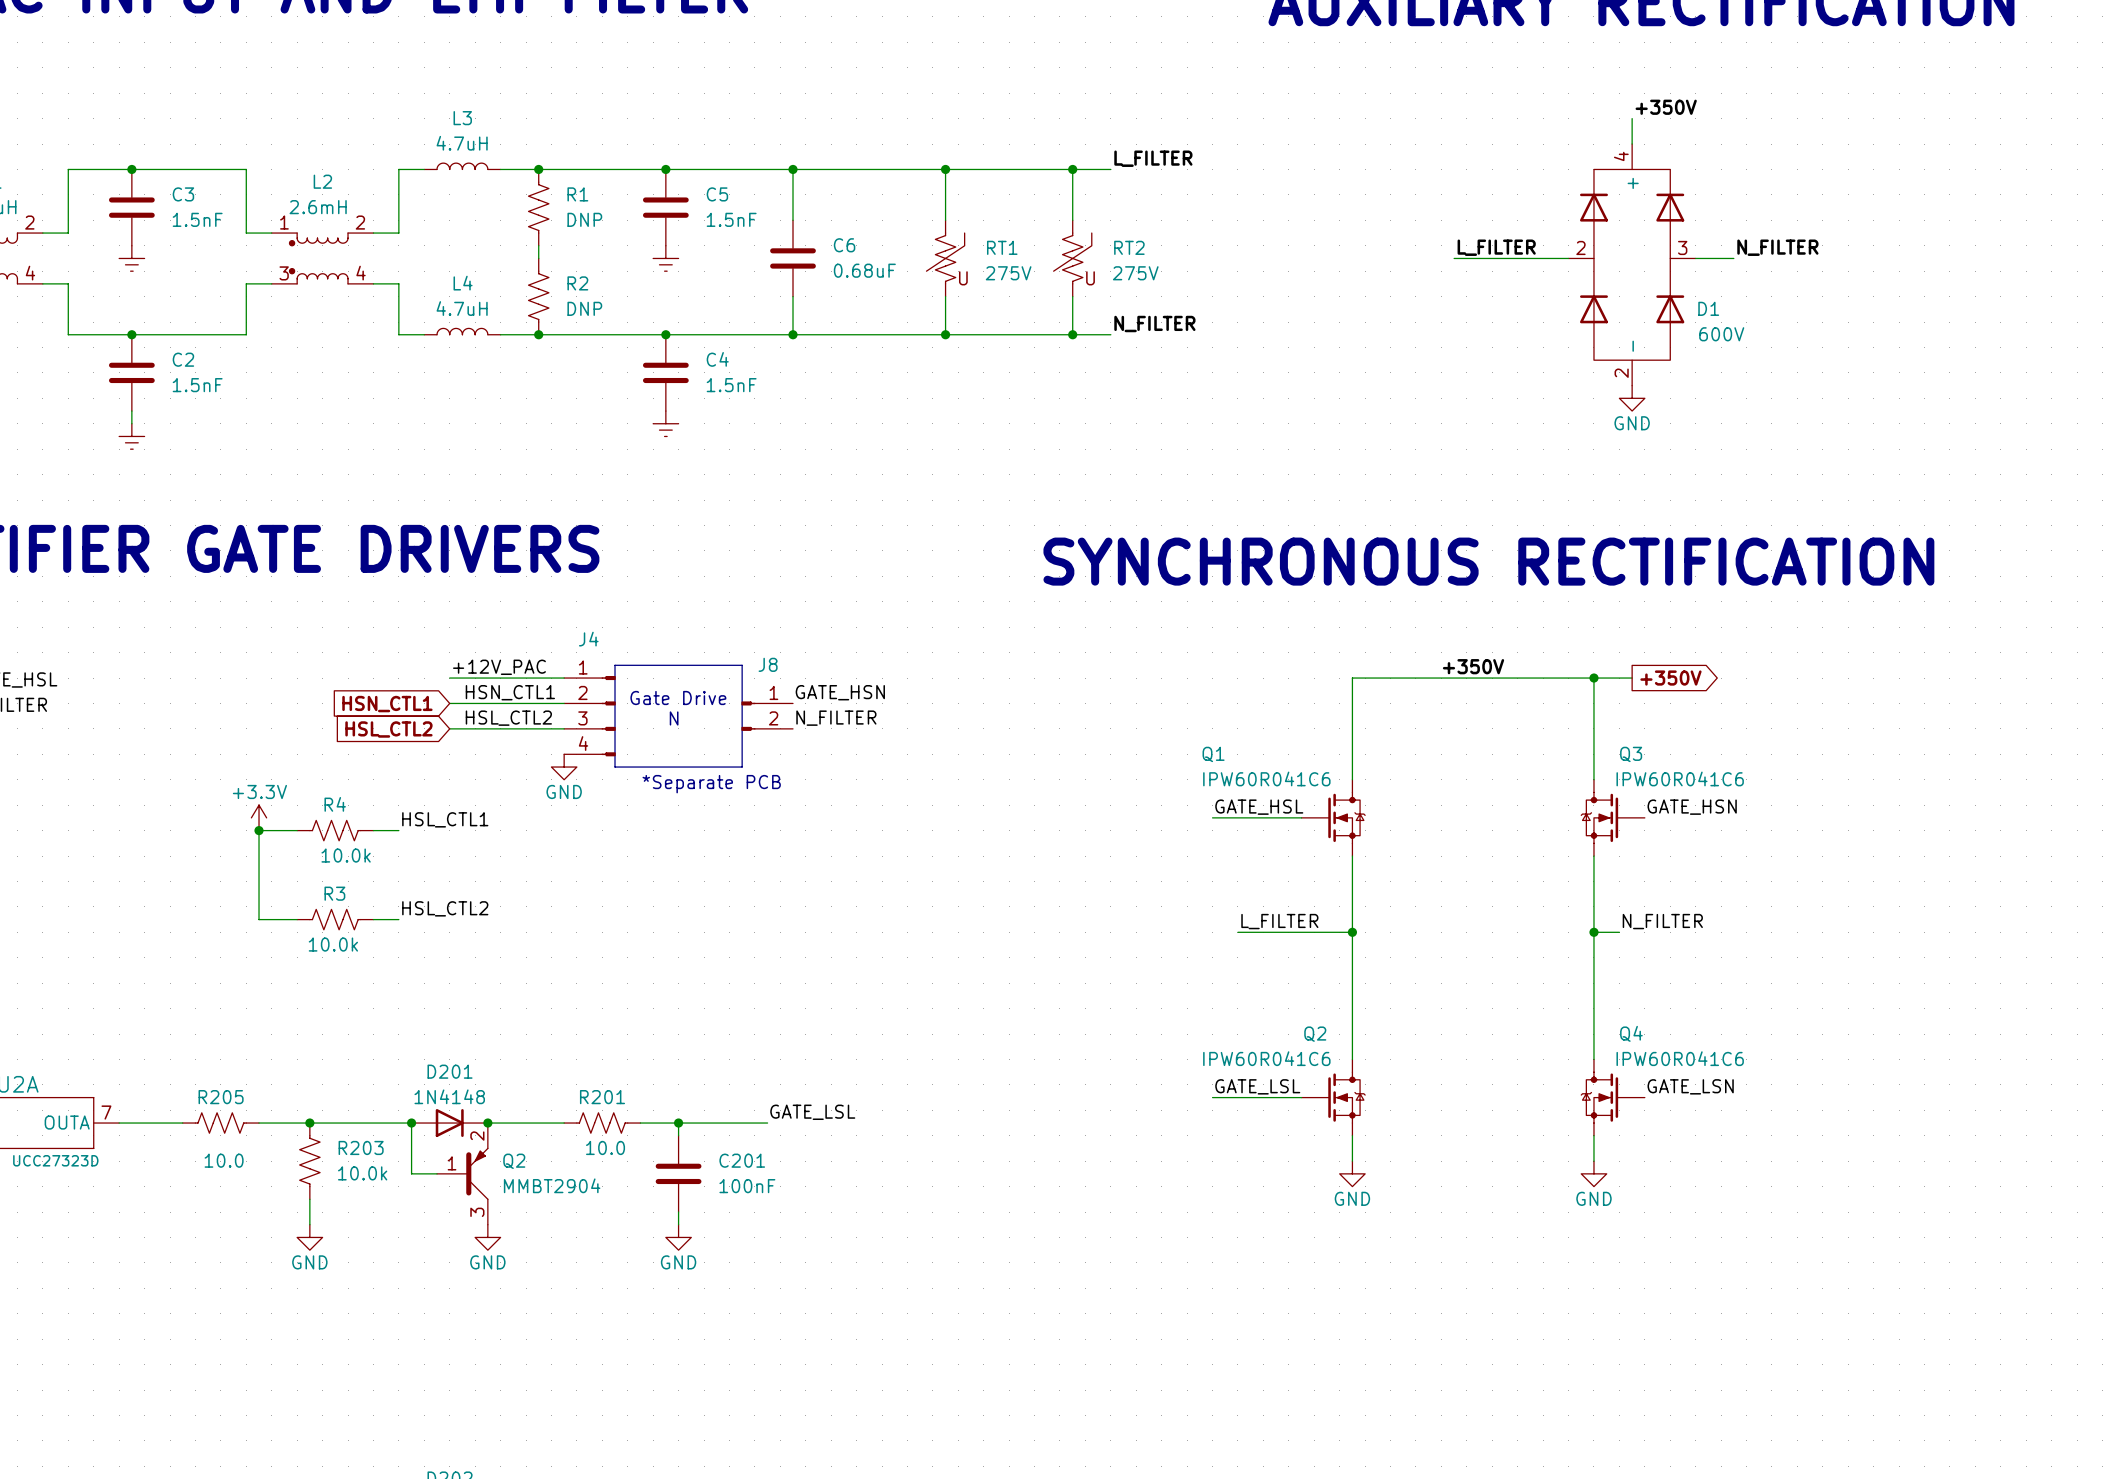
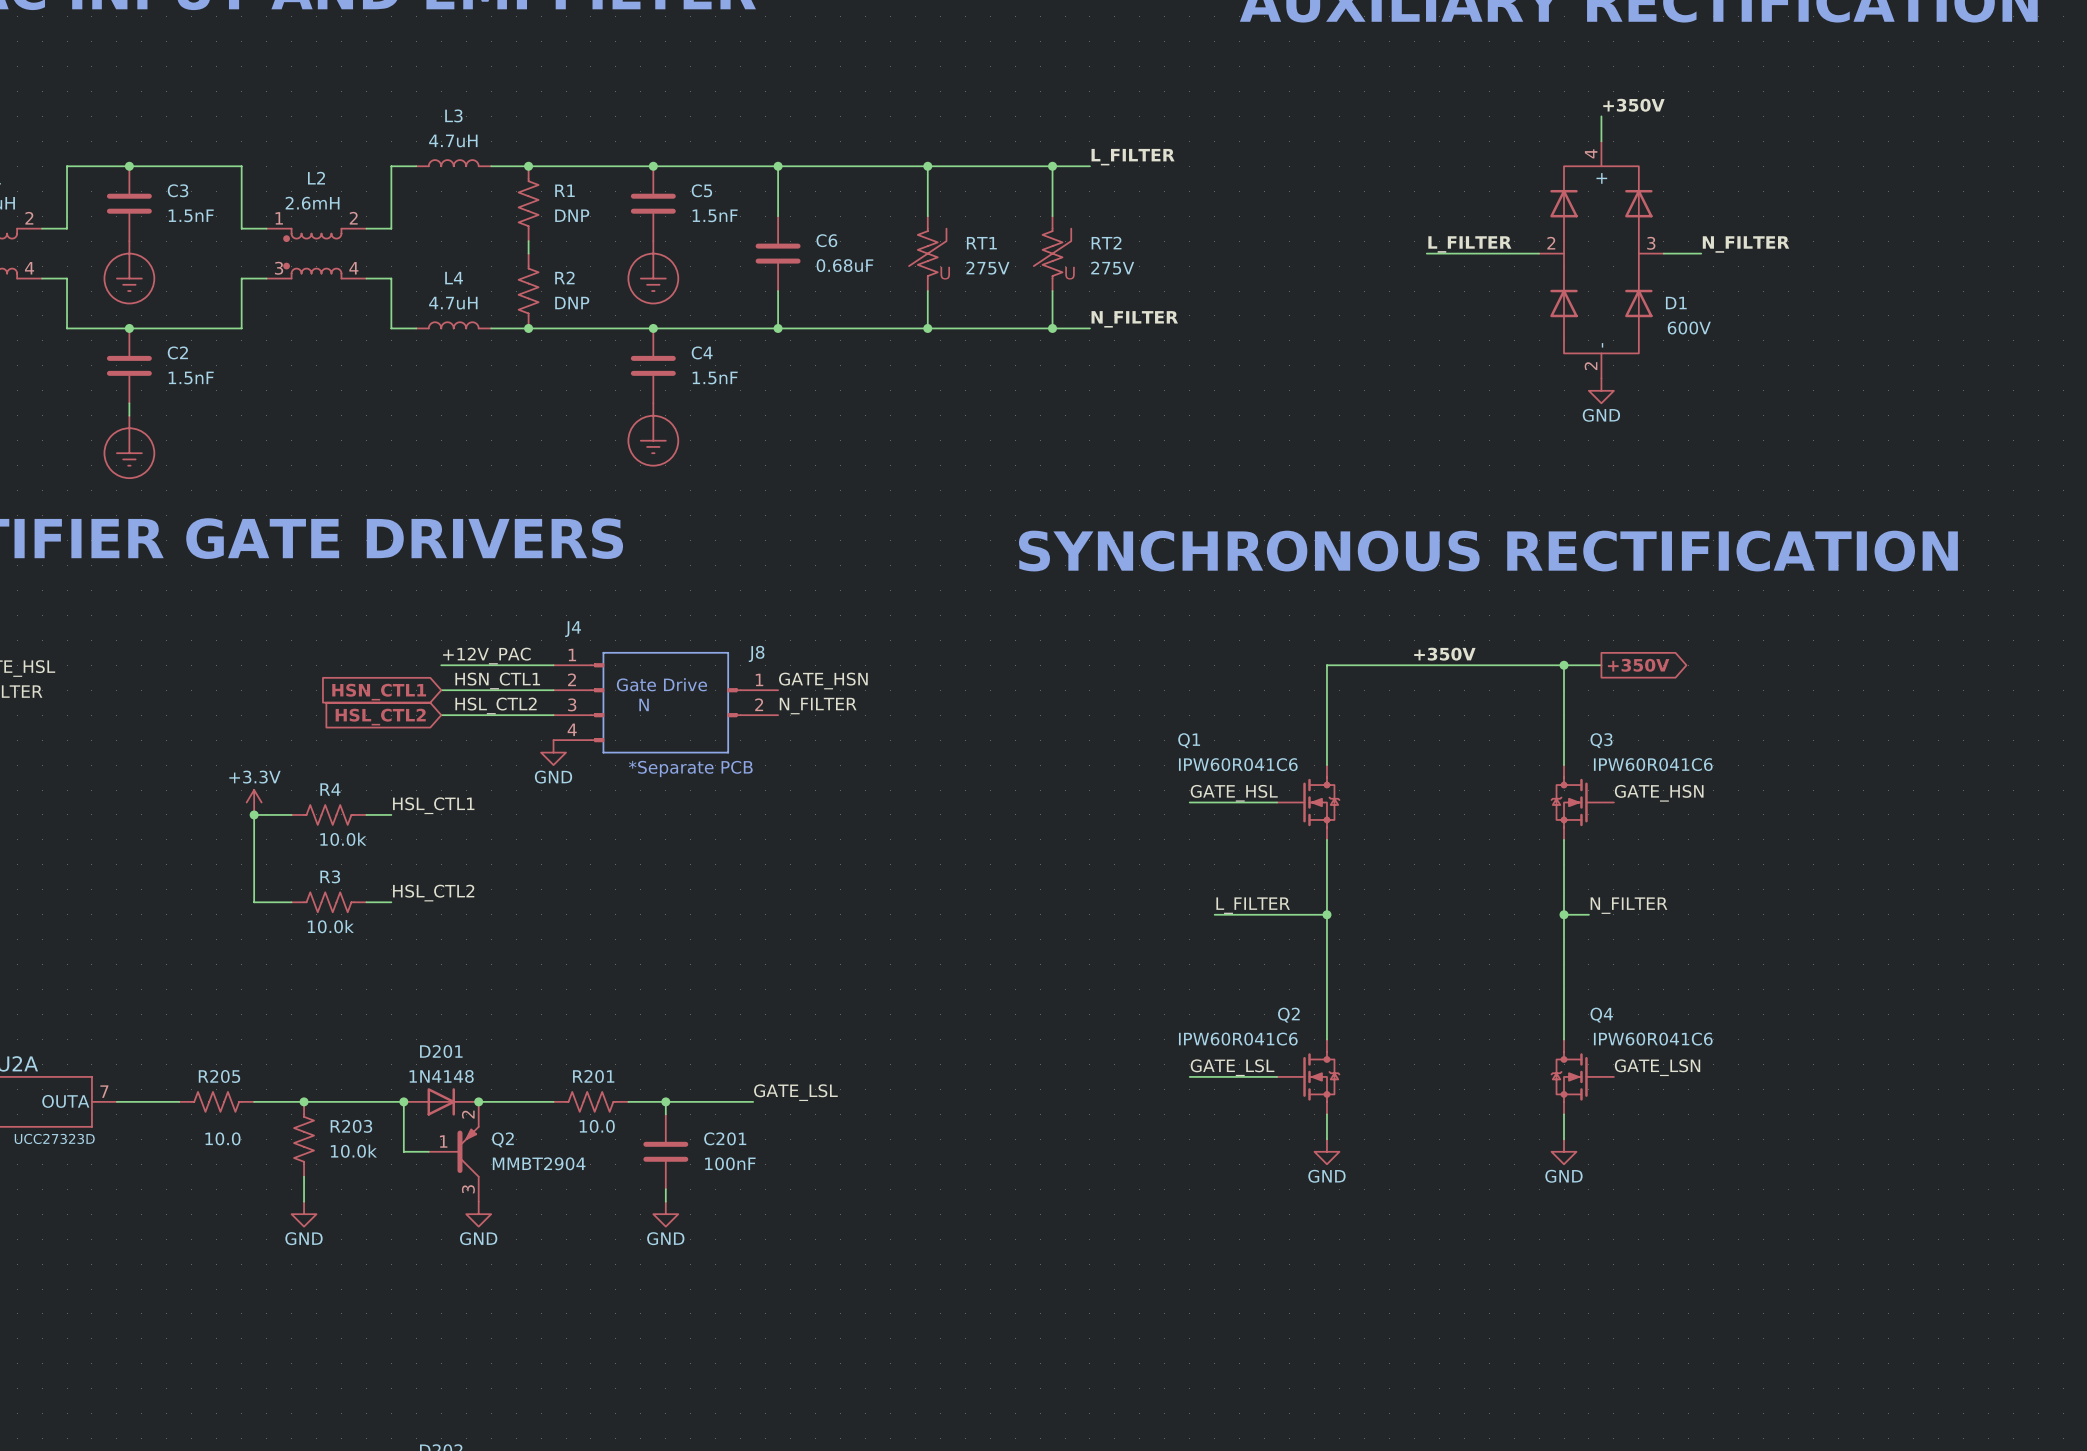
power symbol: (131, 258) -> none
power symbol: (665, 258) -> none
power symbol: none -> (129, 272)
power symbol: none -> (653, 272)
power symbol: (665, 423) -> none
power symbol: (131, 436) -> none
power symbol: none -> (653, 434)
power symbol: none -> (129, 446)

